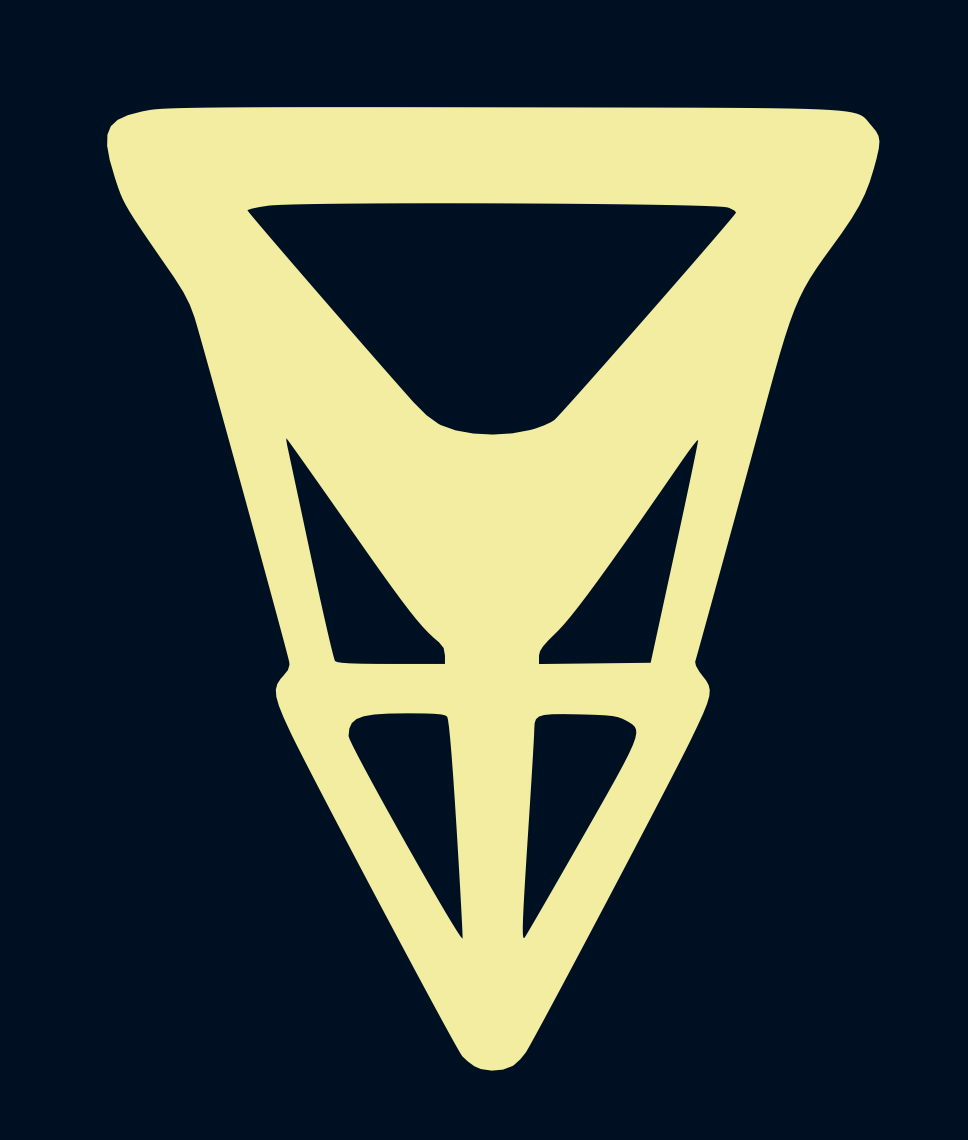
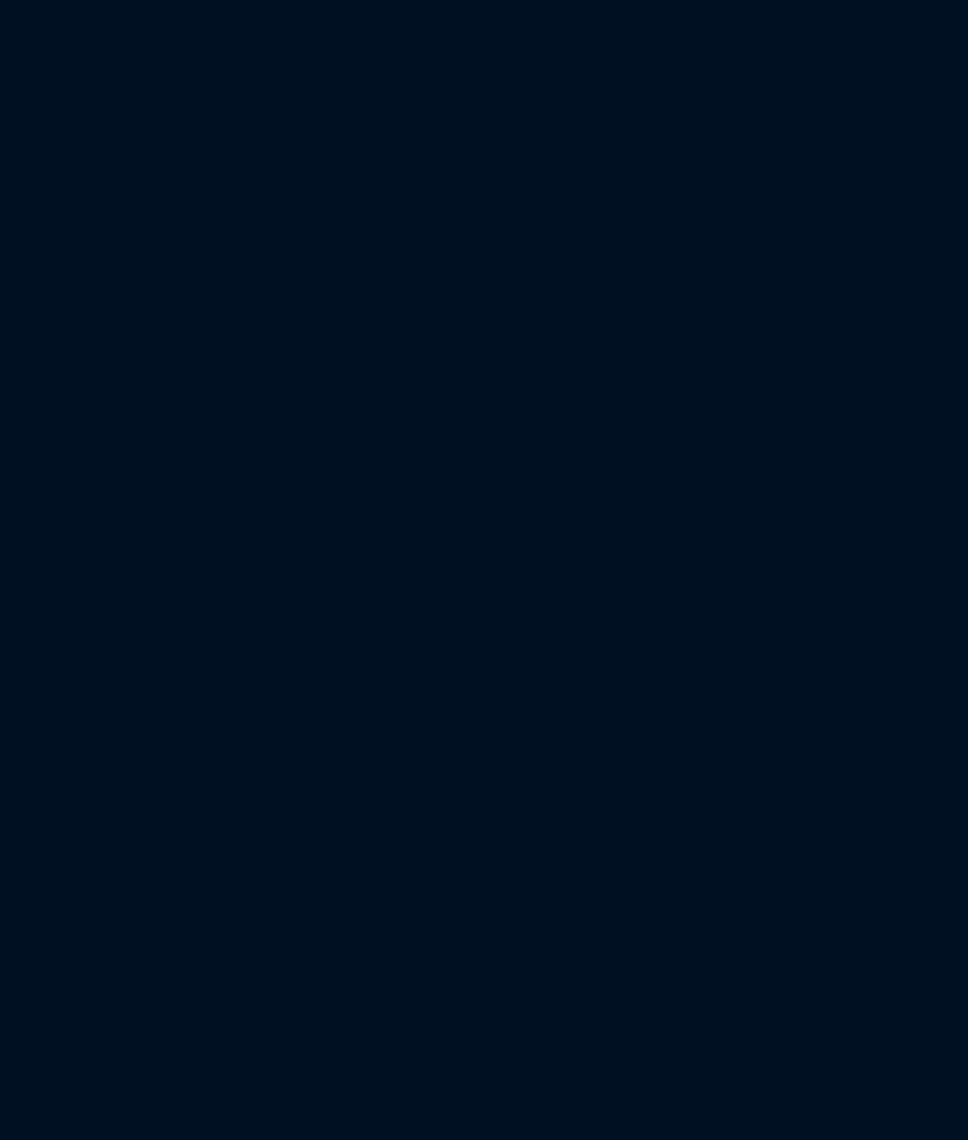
drawing: [107, 107, 880, 1071] -> none

